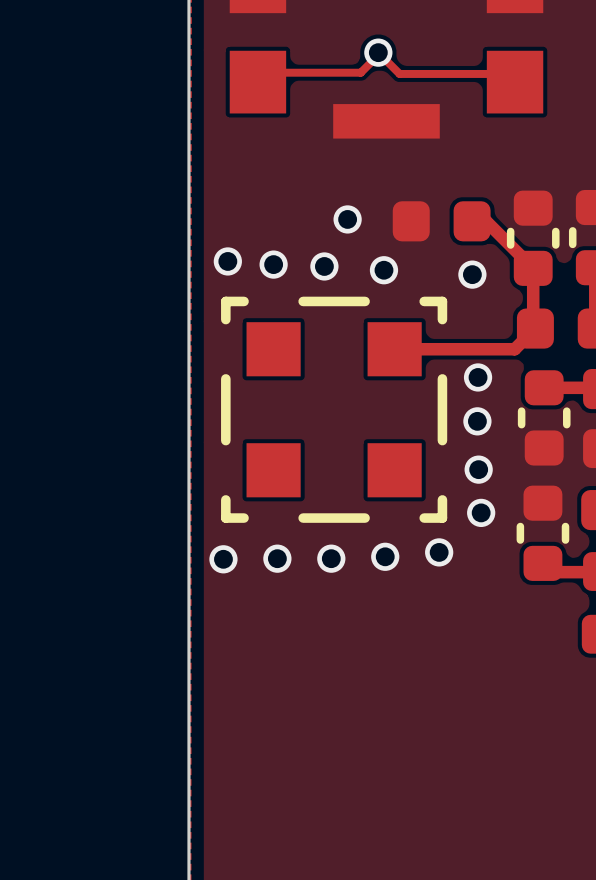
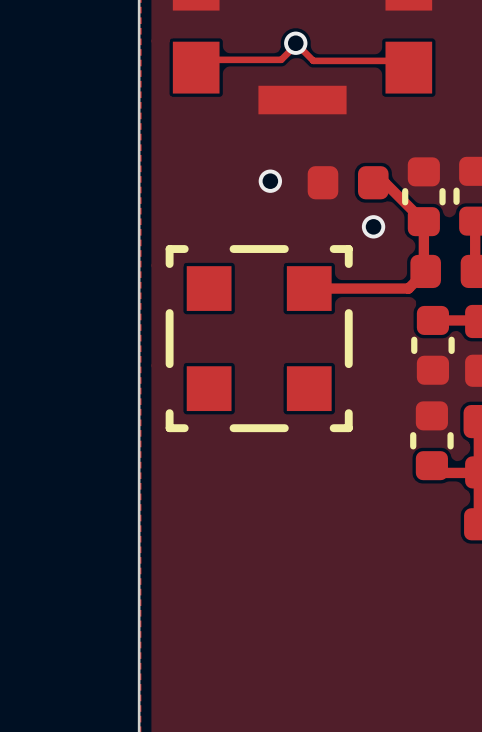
via: (227, 261) -> none
via: (273, 264) -> none
via: (324, 266) -> none
via: (383, 270) -> none
via: (478, 377) -> none
via: (477, 421) -> none
via: (478, 469) -> none
via: (481, 512) -> none
via: (439, 552) -> none
via: (385, 556) -> none
via: (277, 558) -> none
via: (331, 558) -> none
via: (223, 559) -> none

